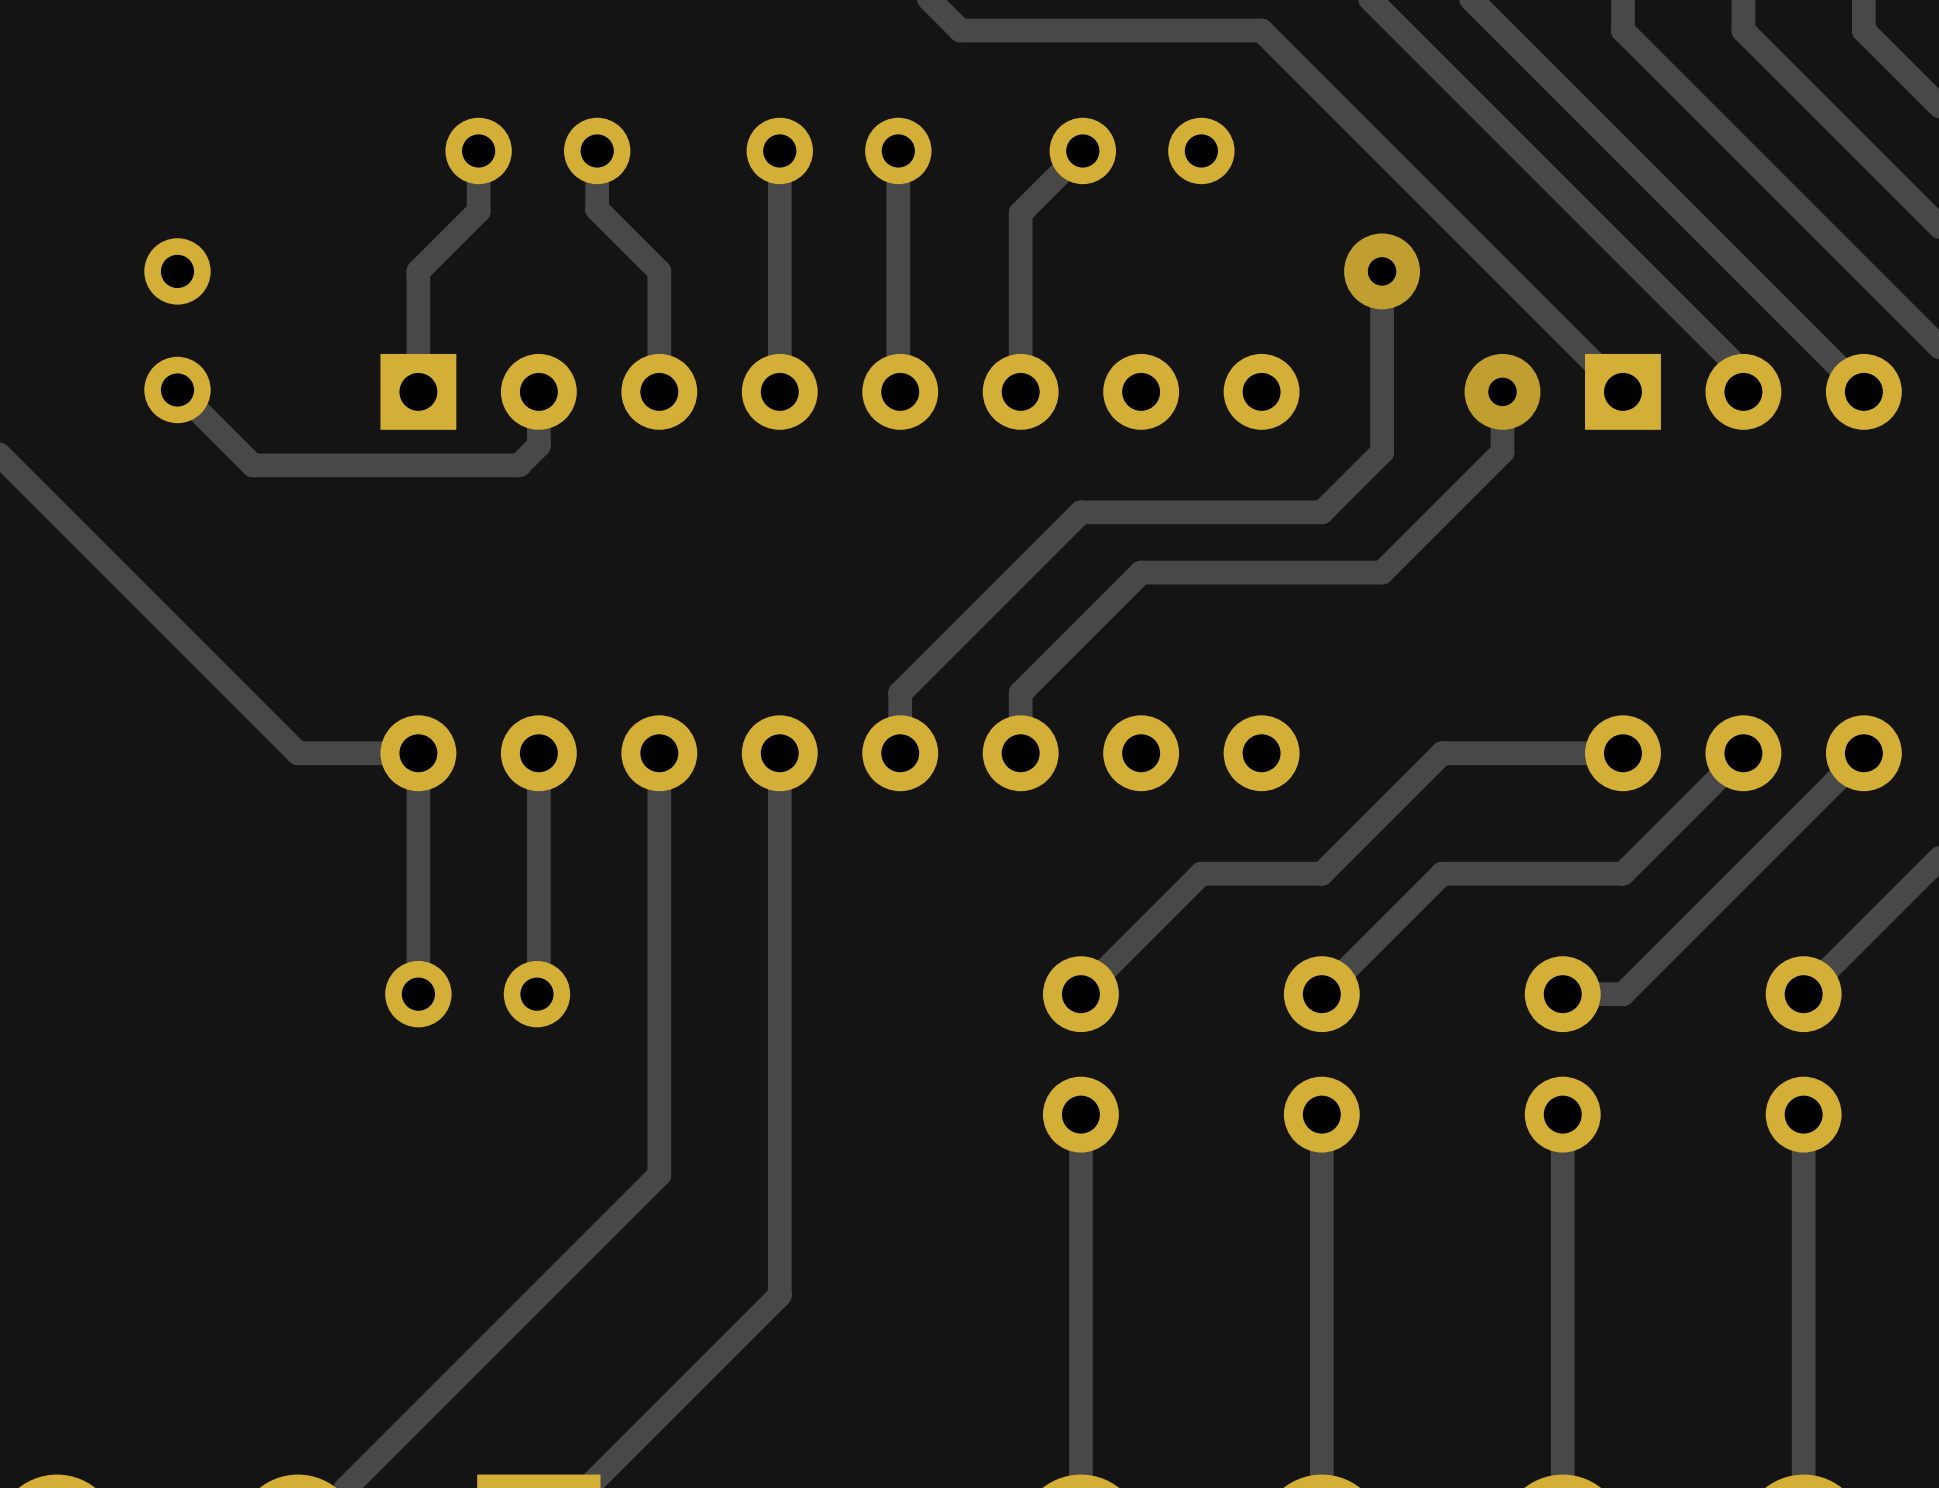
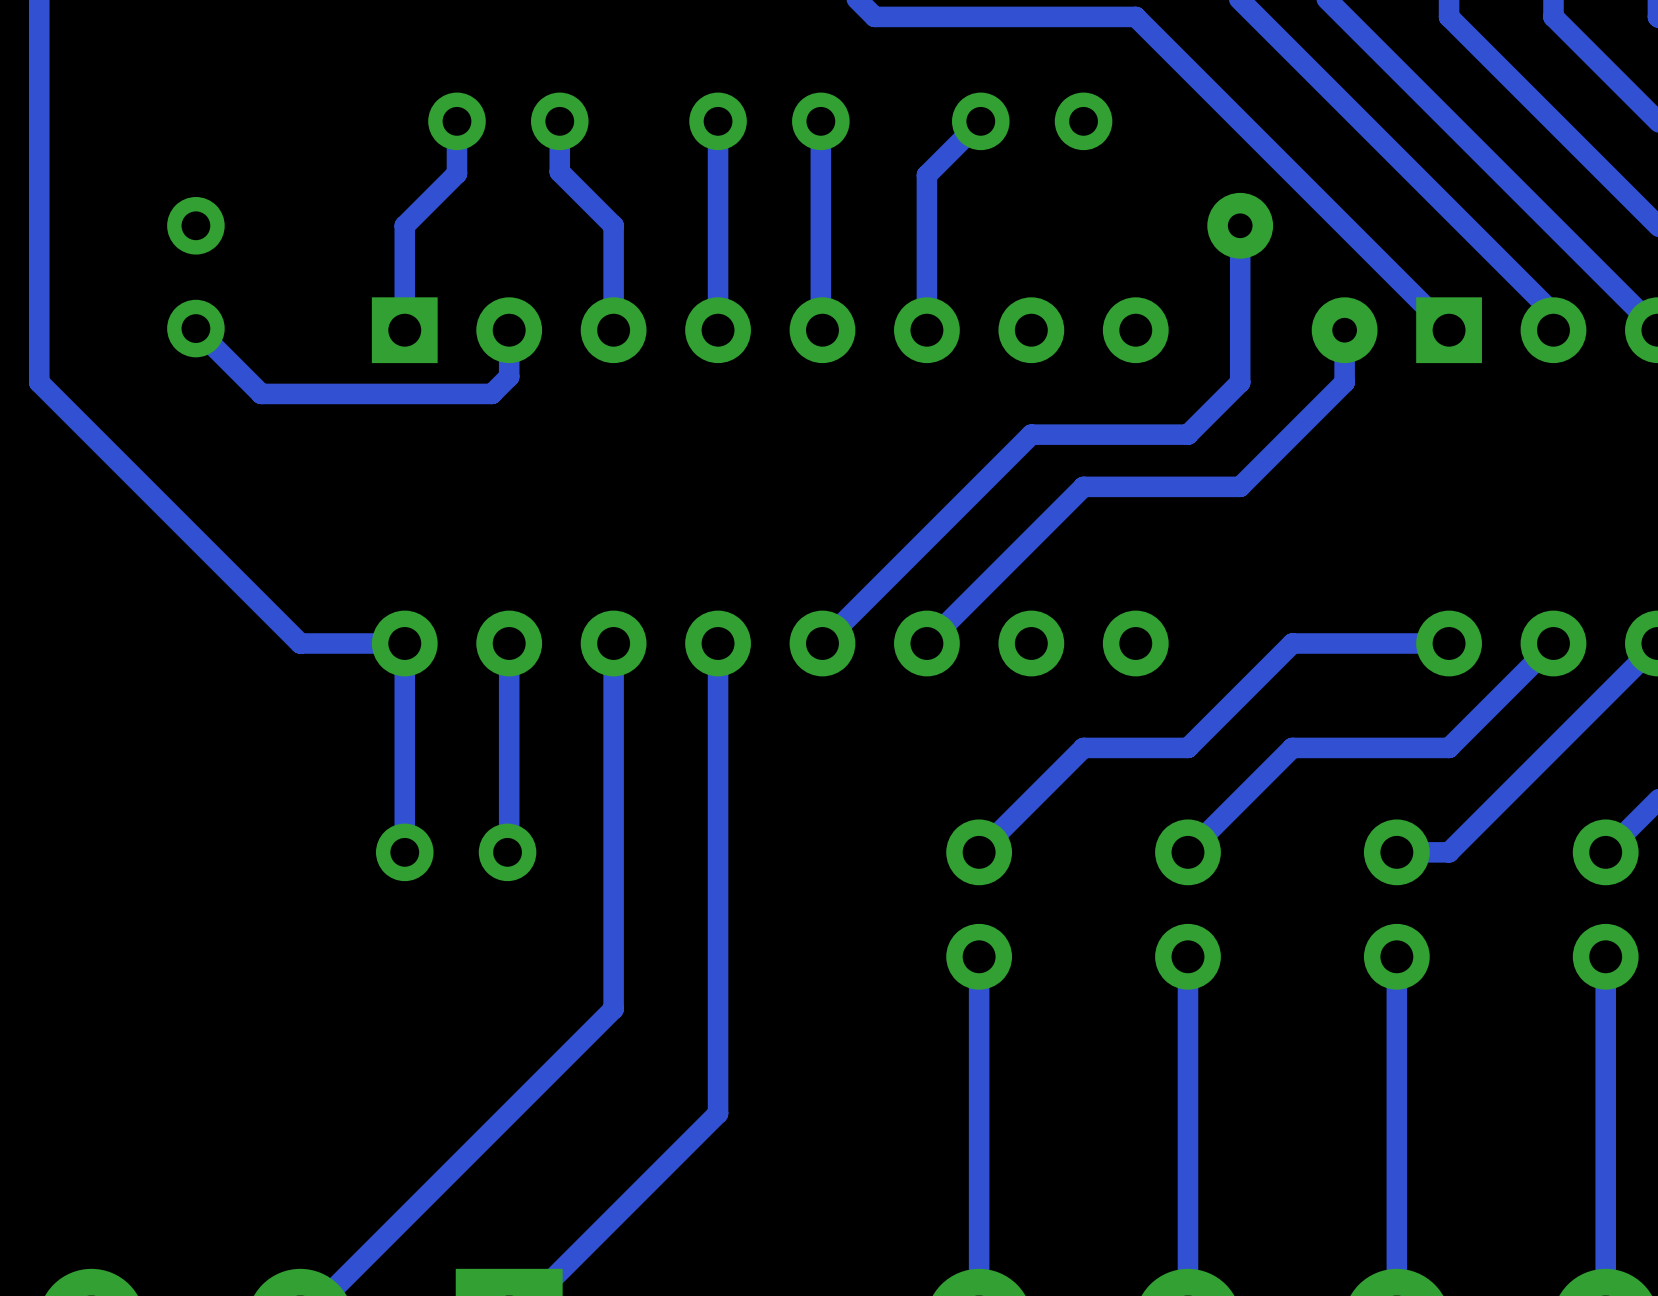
track: (1141, 512) (1080, 512) (900, 693) (900, 753) -> (1031, 434) (822, 643)
track: (1201, 572) (1141, 572) (1020, 693) (1020, 753) -> (1083, 486) (926, 643)

